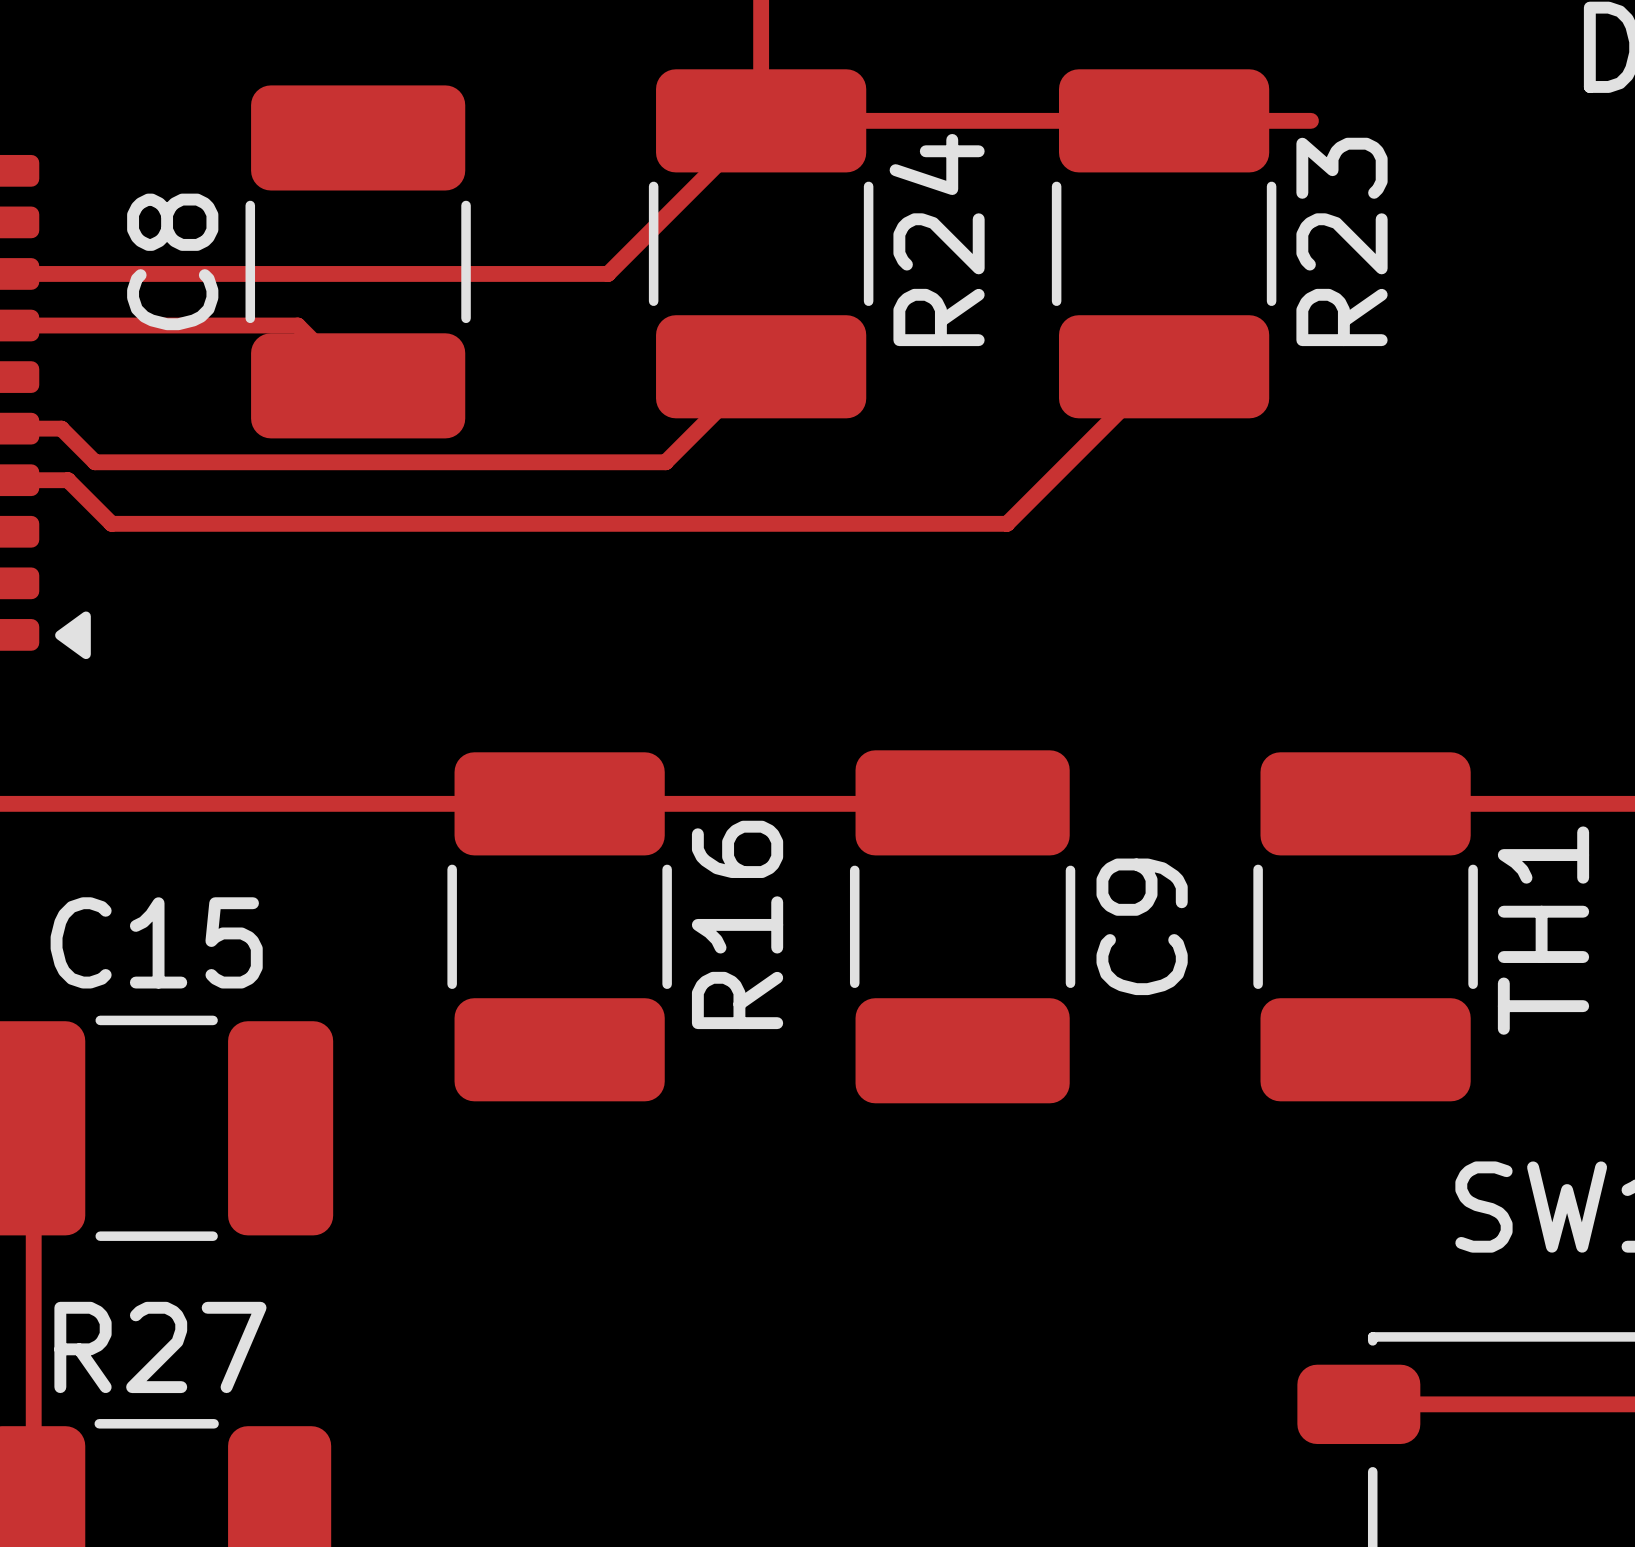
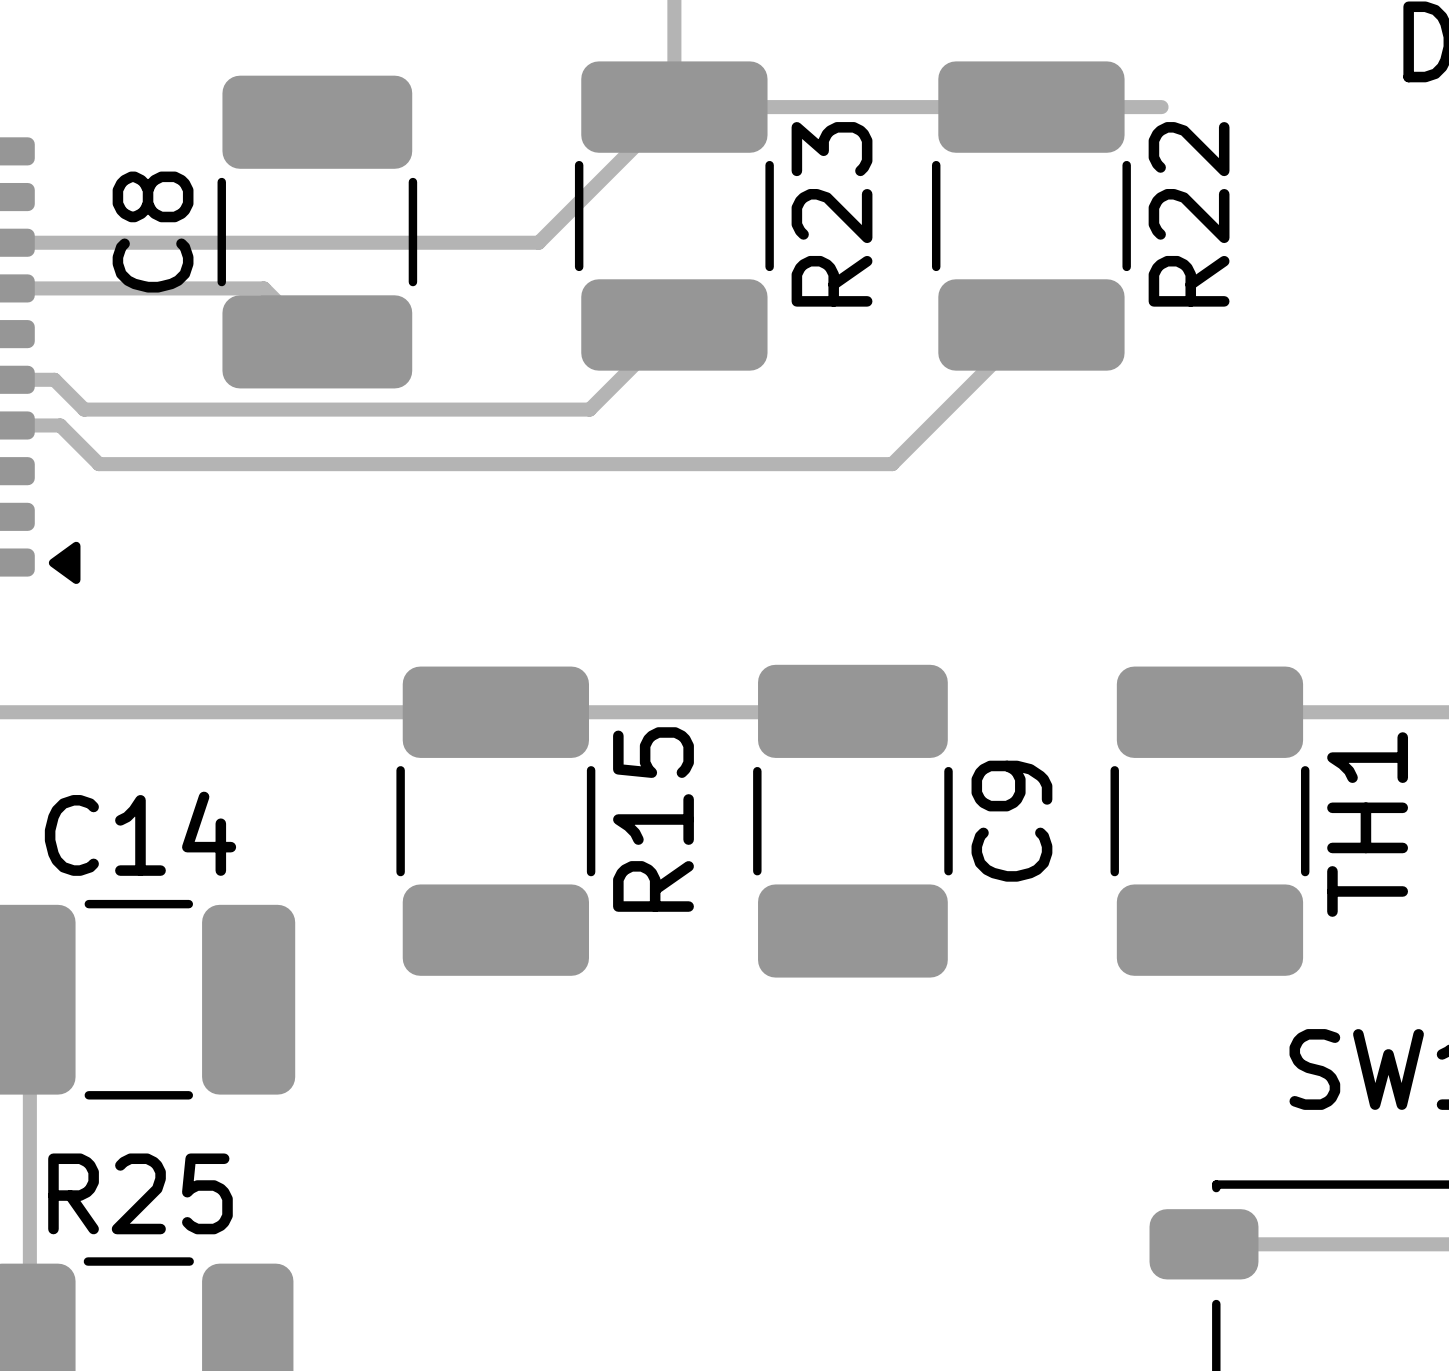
R24 name: R24 (937, 240) -> R23 (832, 214)
R23 name: R23 (1342, 241) -> R22 (1189, 214)
R16 name: R16 (737, 924) -> R15 (653, 819)
C15 name: C15 (156, 942) -> C14 (140, 833)
R27 name: R27 (160, 1347) -> R25 (140, 1193)

